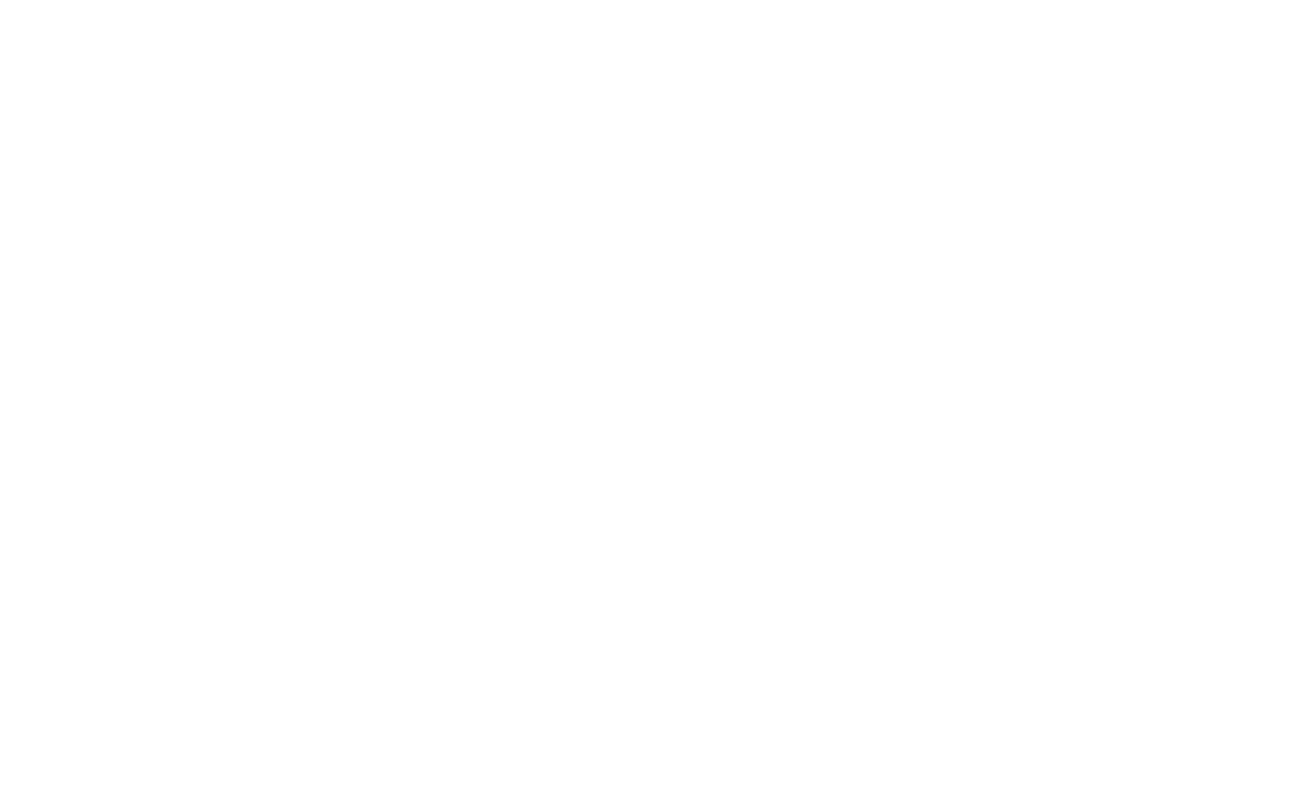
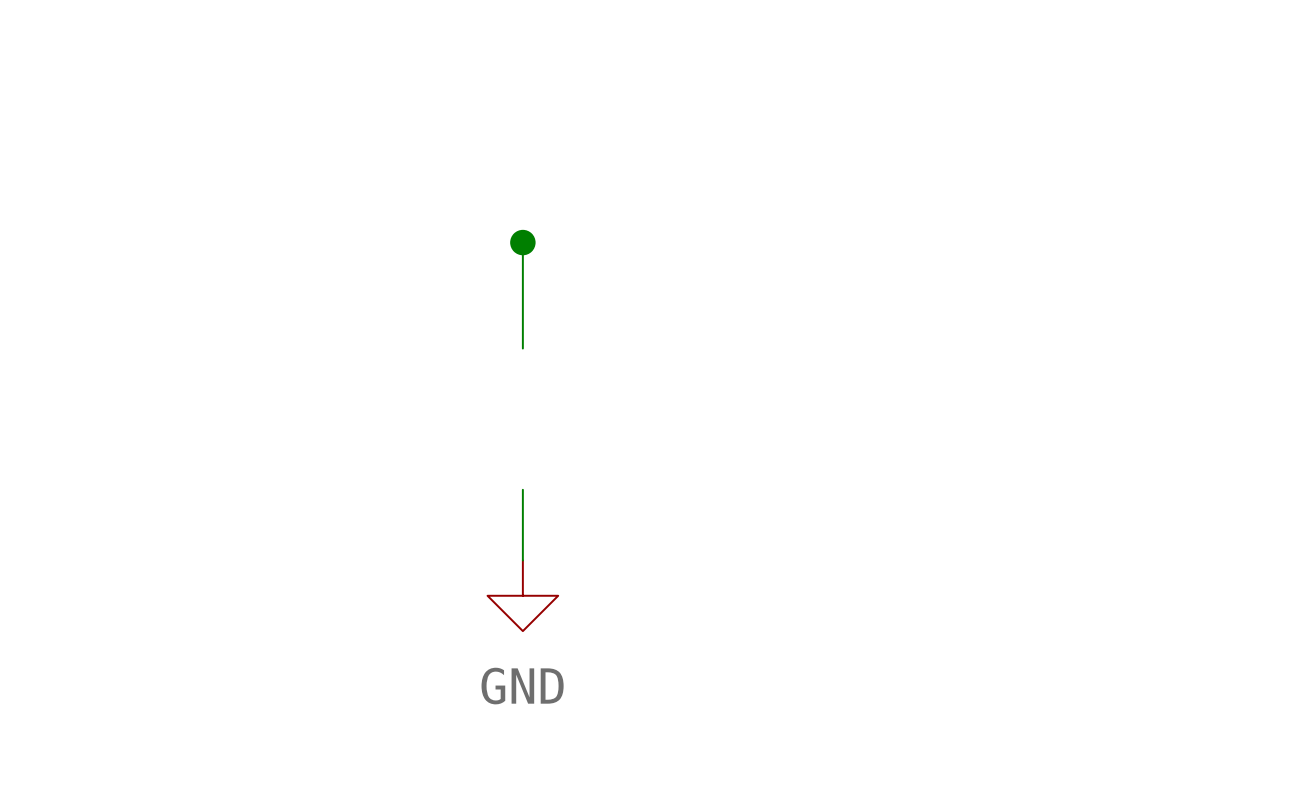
wire: none -> (522, 242) (522, 348)
junction: none -> (522, 242)
wire: none -> (522, 489) (522, 560)
power symbol: none -> GND (522, 595)

